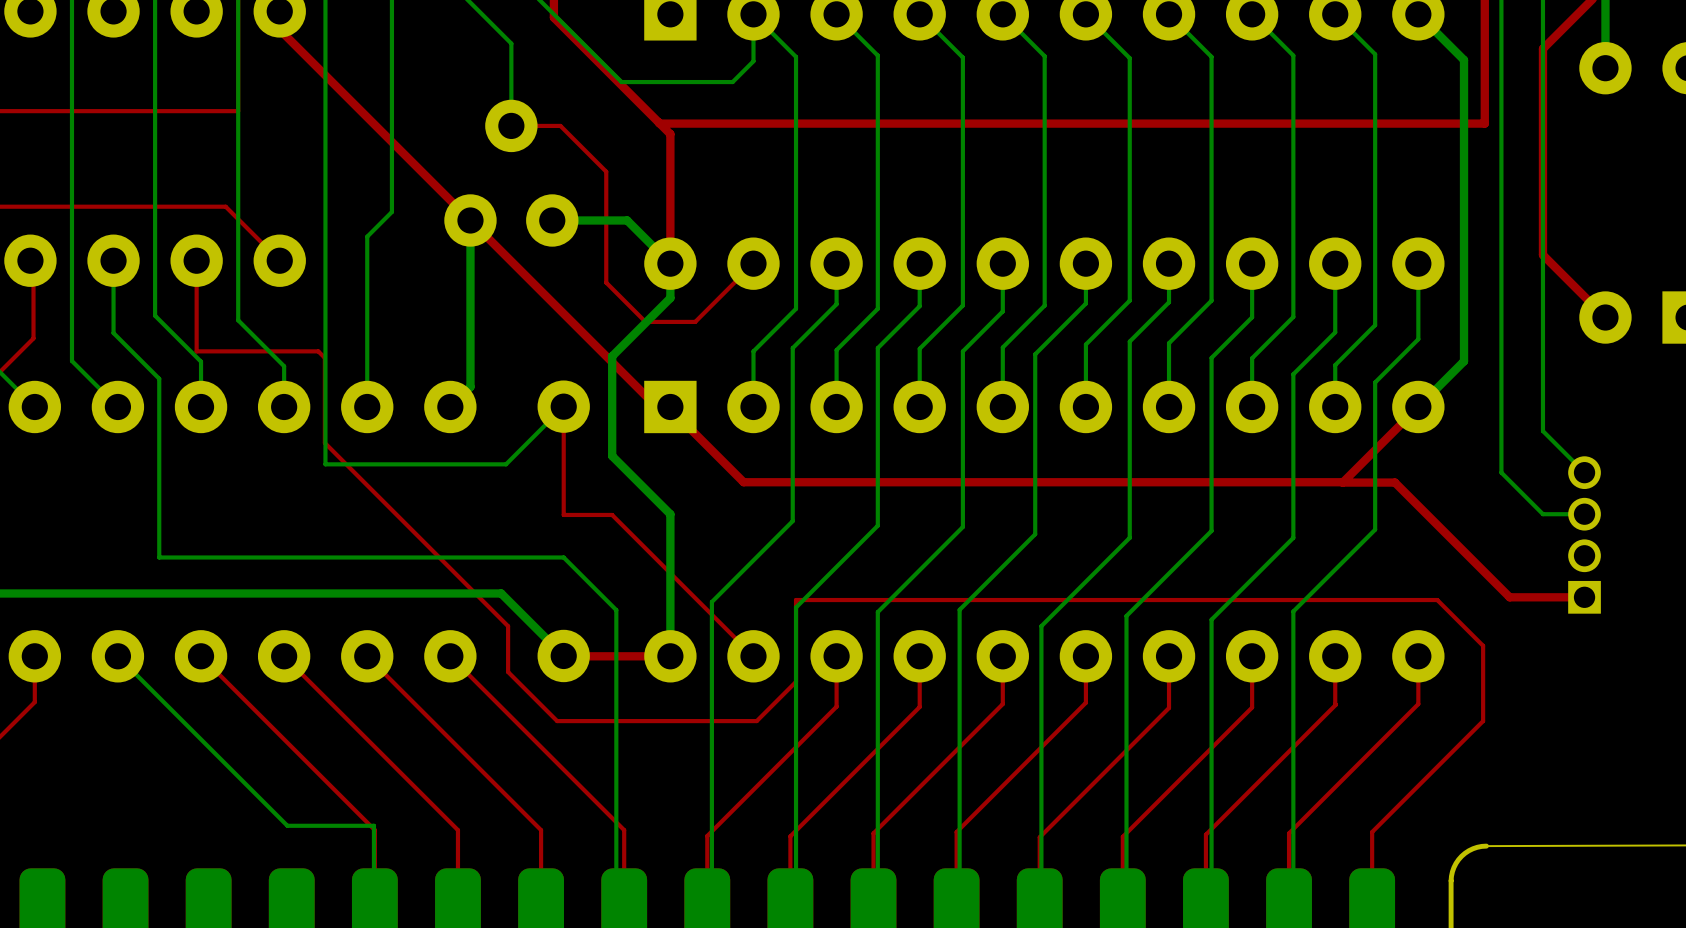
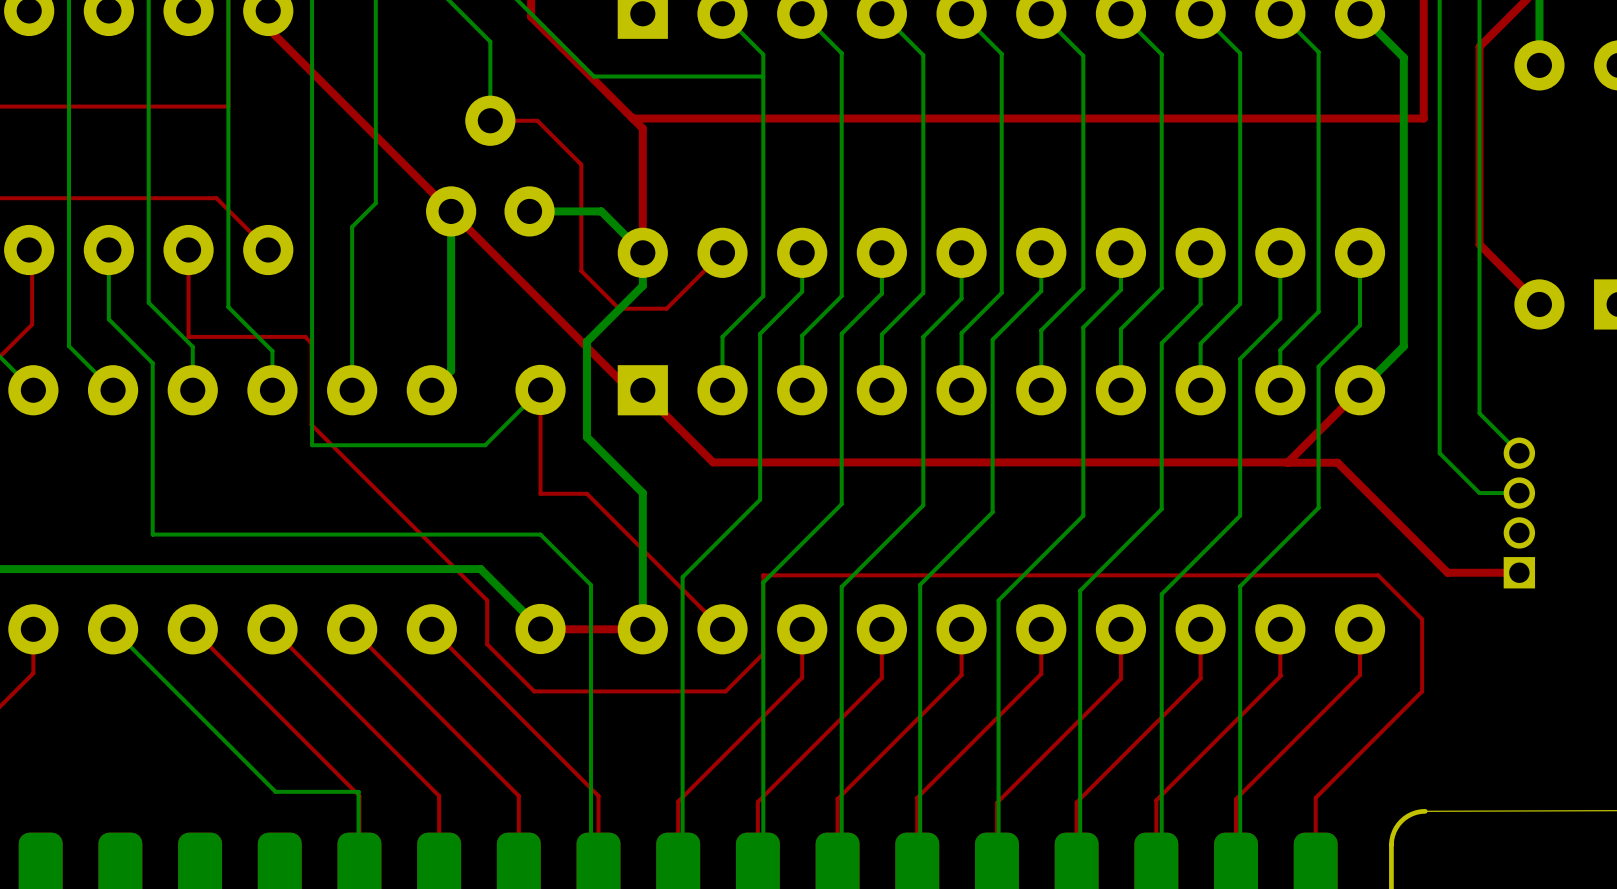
bottom track: (753, 14) (753, 61) (732, 82) (621, 82) (619, 79) -> (763, 76) (593, 76)

